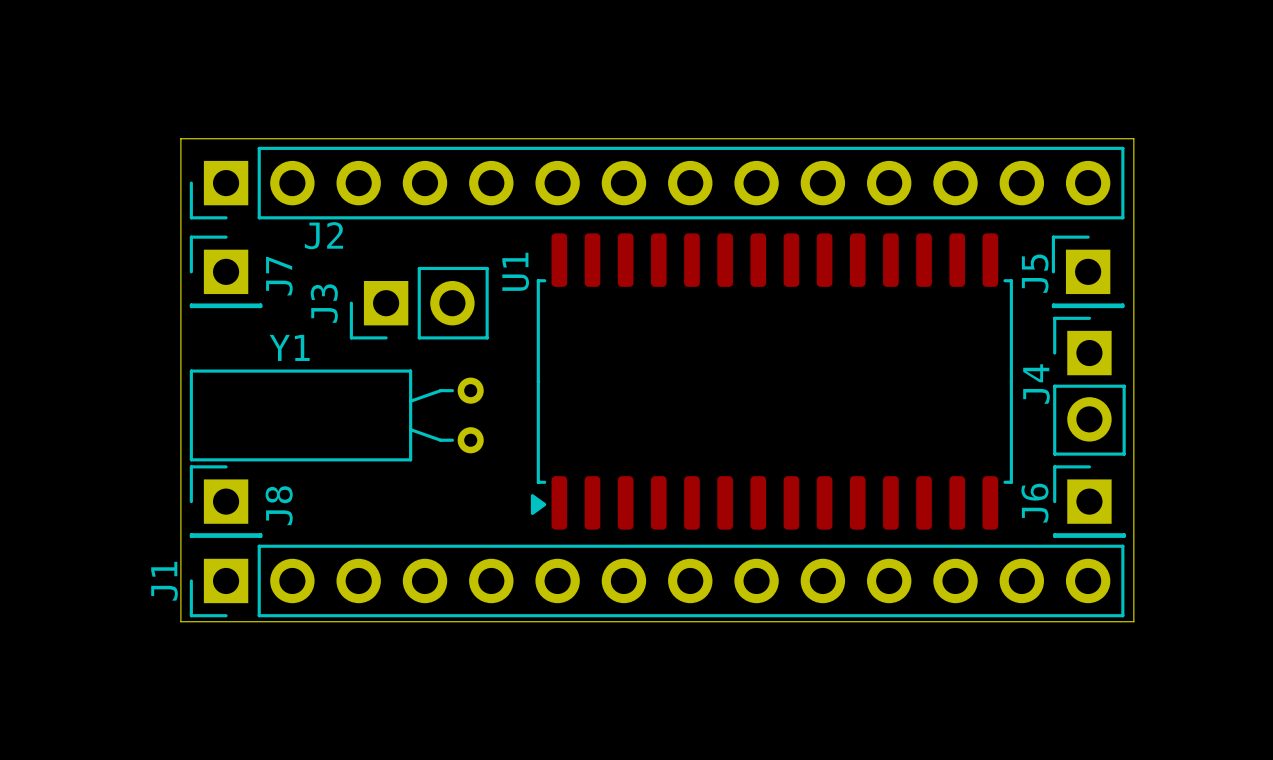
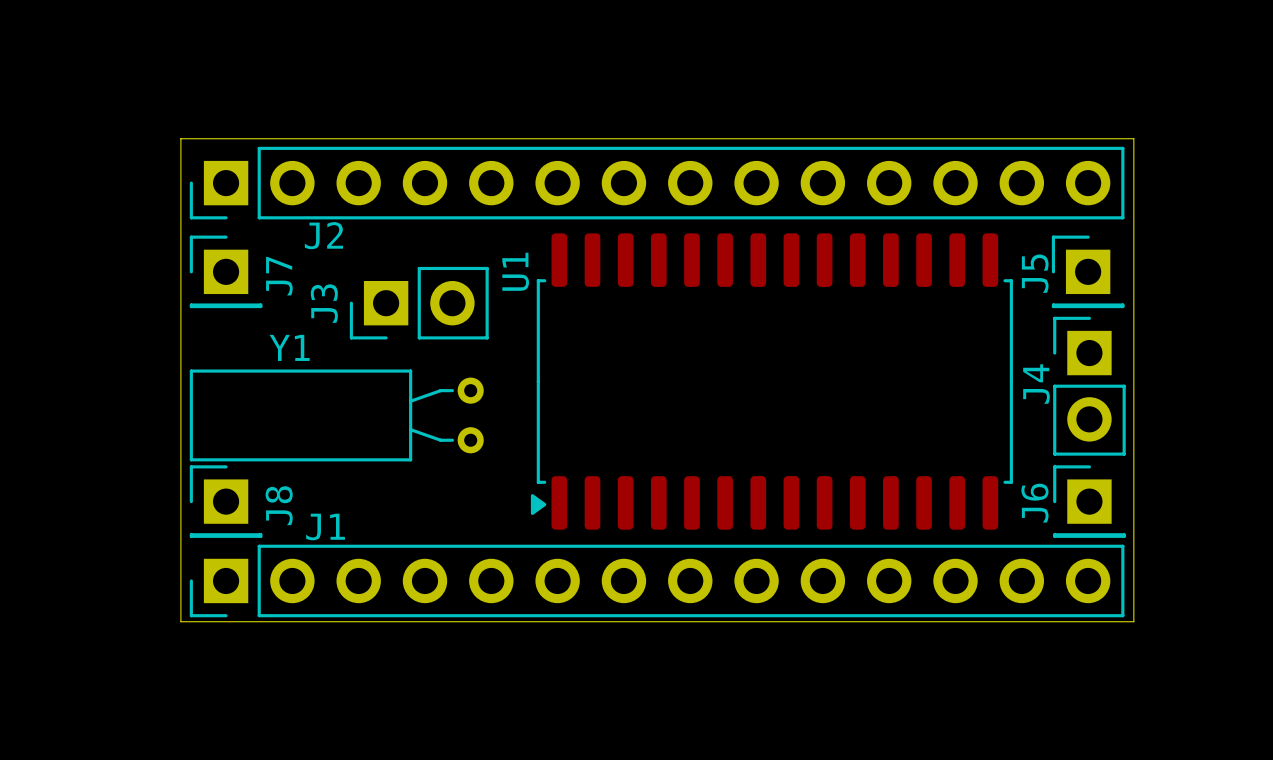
J1 name rotation: 0° (164, 581) -> 90° clockwise (325, 526)
J1 name position: J1 (164, 581) -> J1 (325, 526)

